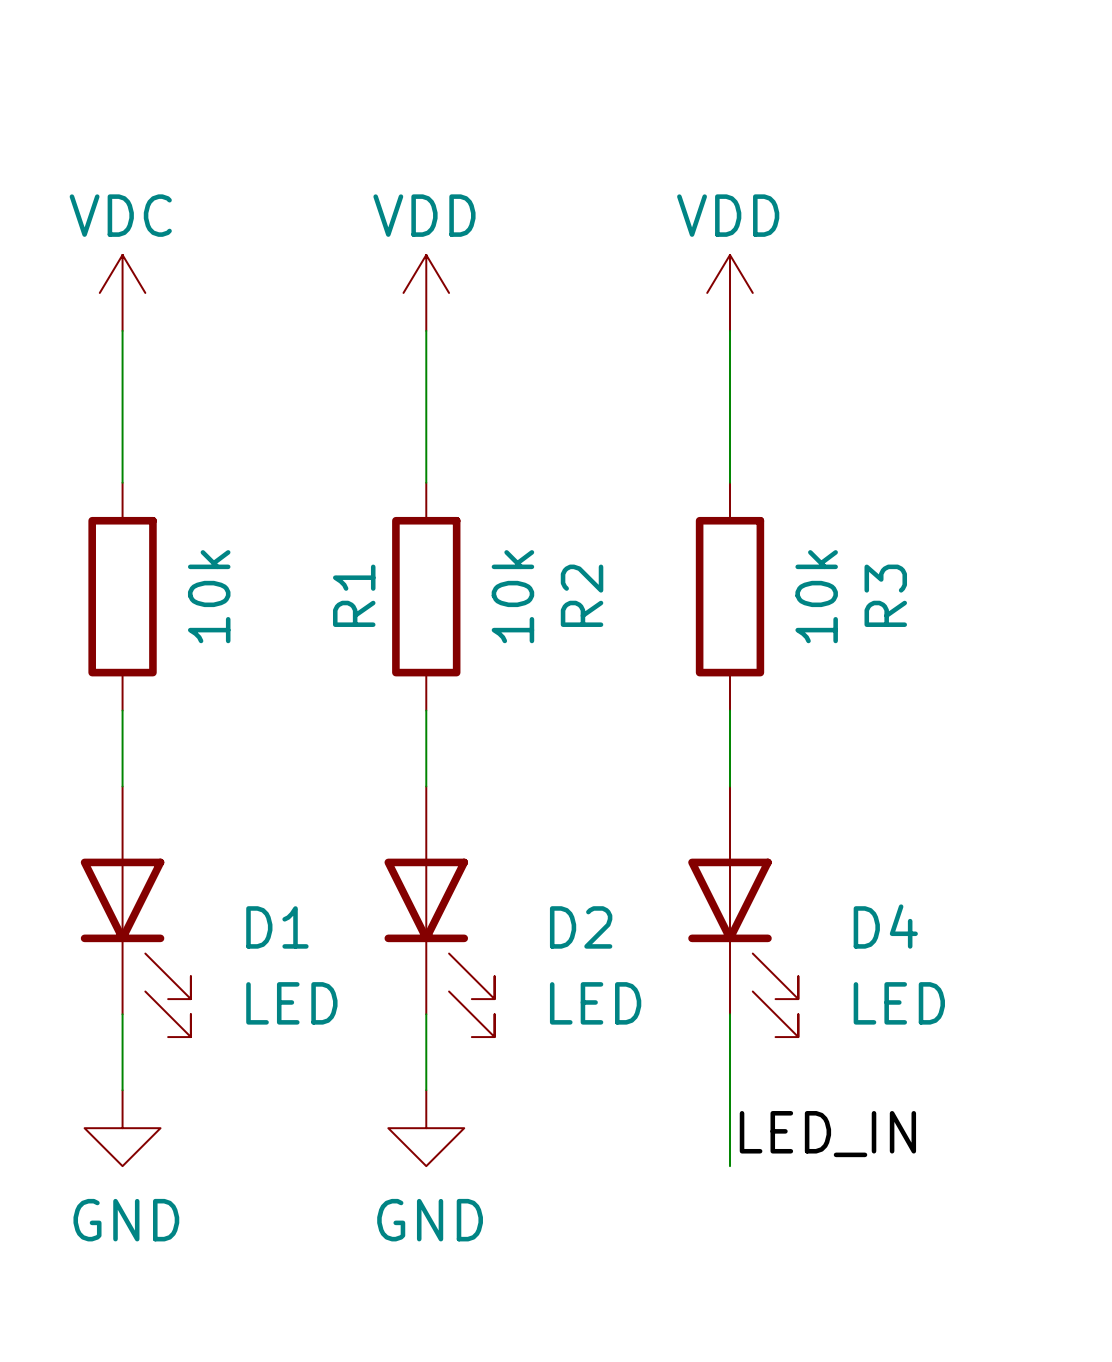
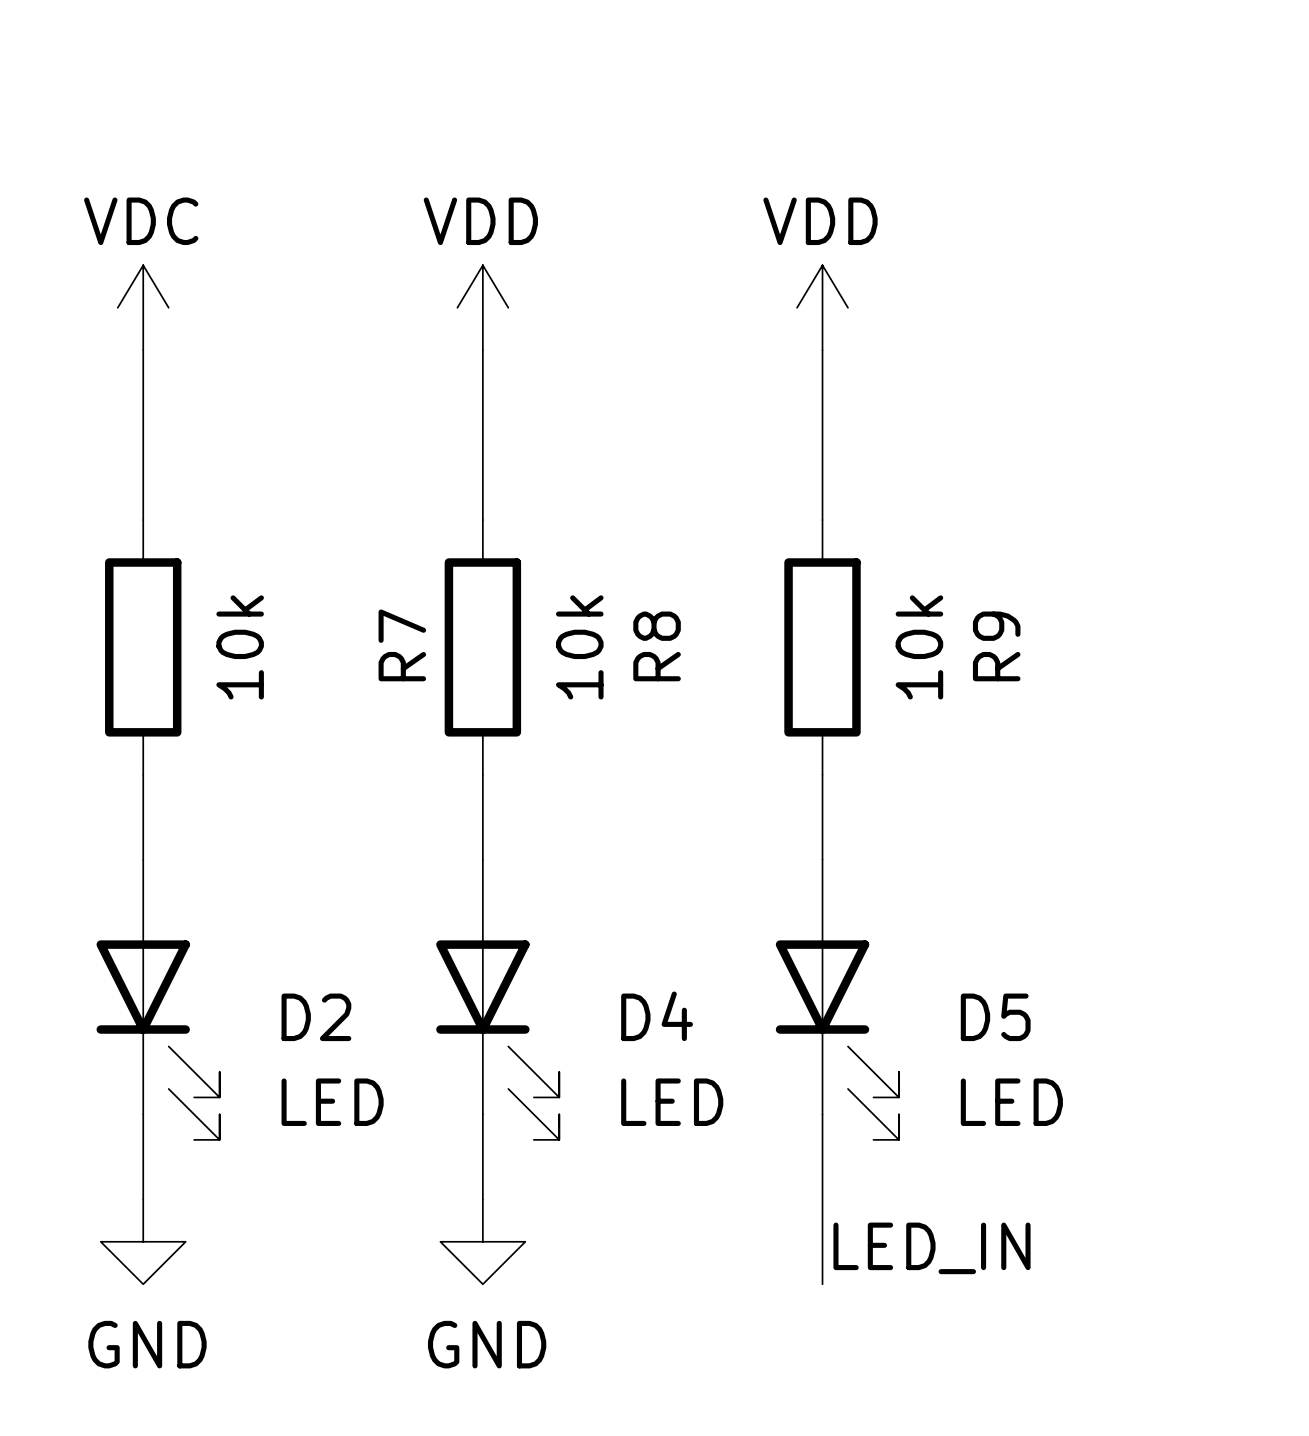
R1 name: R1 (354, 595) -> R7 (402, 645)
R2 name: R2 (582, 595) -> R8 (657, 646)
R3 name: R3 (885, 595) -> R9 (996, 646)
D4 name: D4 (885, 926) -> D5 (995, 1017)
D1 name: D1 (277, 927) -> D2 (316, 1017)
D2 name: D2 (581, 927) -> D4 (657, 1016)

